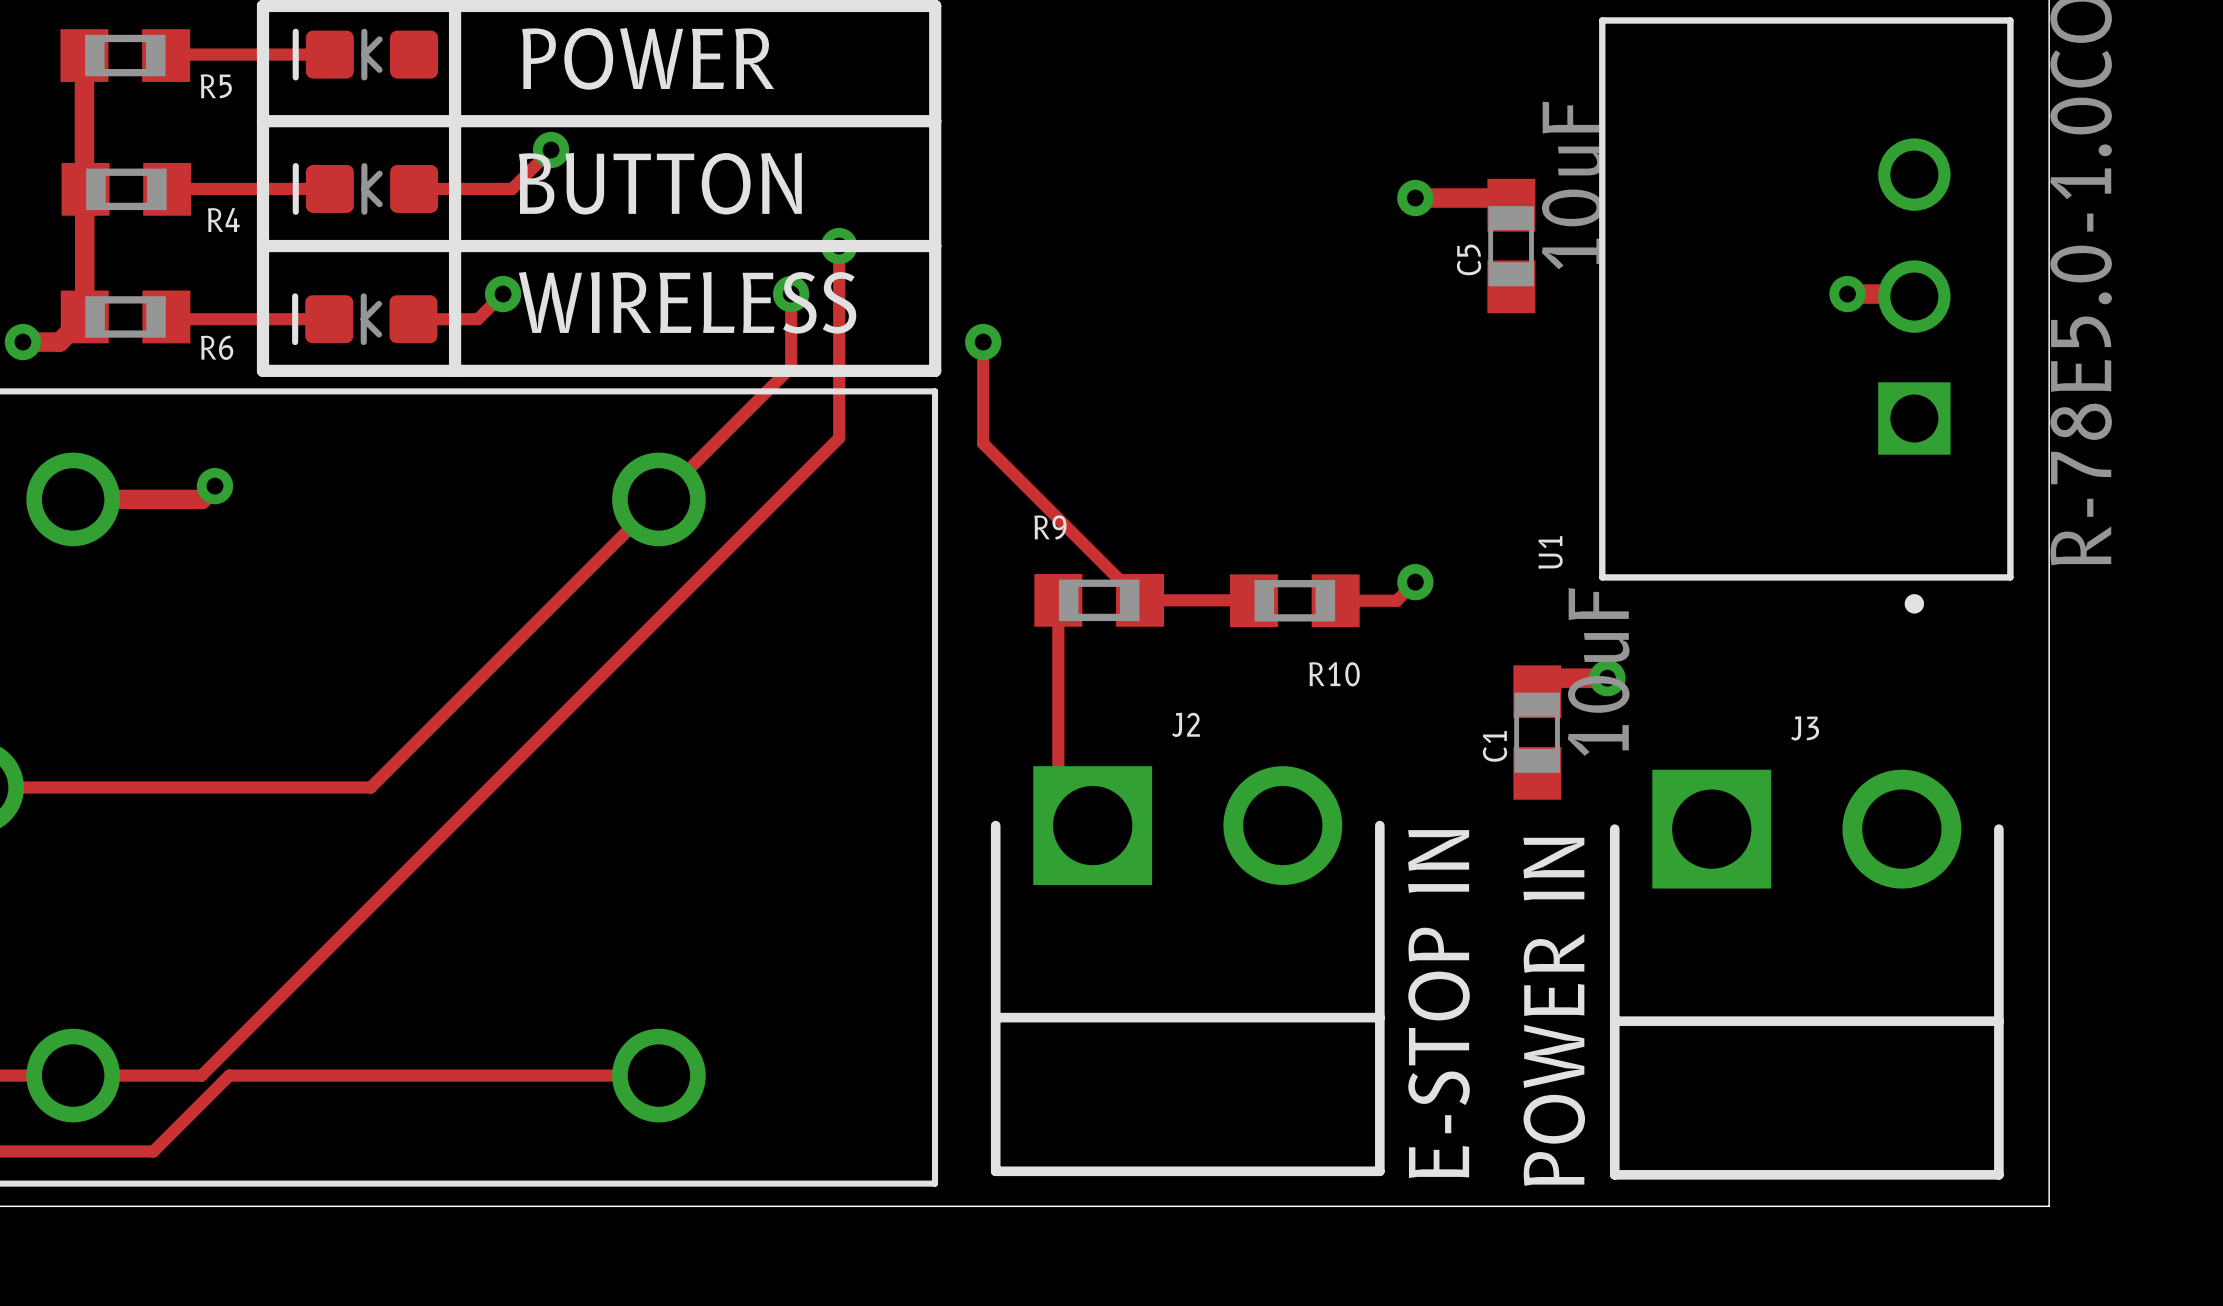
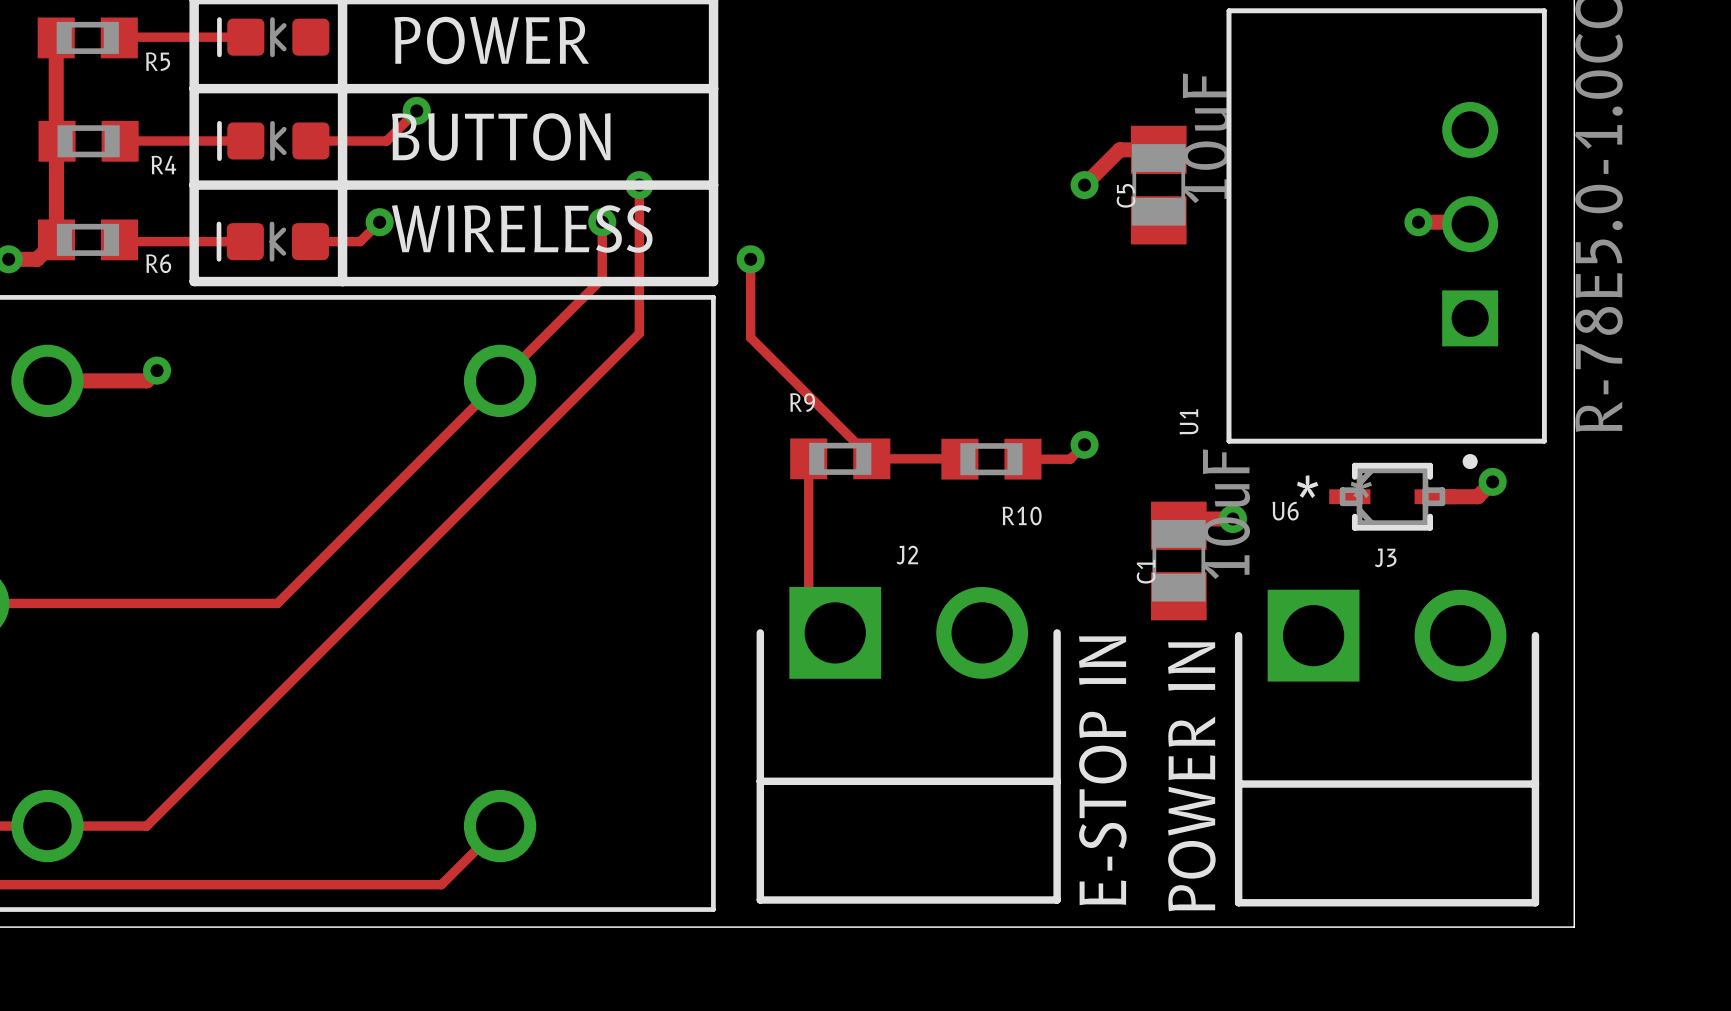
C5 footprint: [1487, 178, 1536, 314] -> [1130, 125, 1187, 245]
track: (1415, 198) (1504, 198) (1511, 205) -> none
via position: (1415, 198) -> (1084, 185)
track: none -> (1158, 149) (1119, 149) (1084, 185)
track: none -> (1492, 481) (1477, 496) (1435, 496)
via: none -> (1492, 481)
U6: none -> (1392, 496)
C1 footprint: [1513, 665, 1562, 800] -> [1151, 501, 1207, 621]
track: (658, 1075) (229, 1075) (153, 1151) -> (500, 826) (441, 884) (109, 884)

